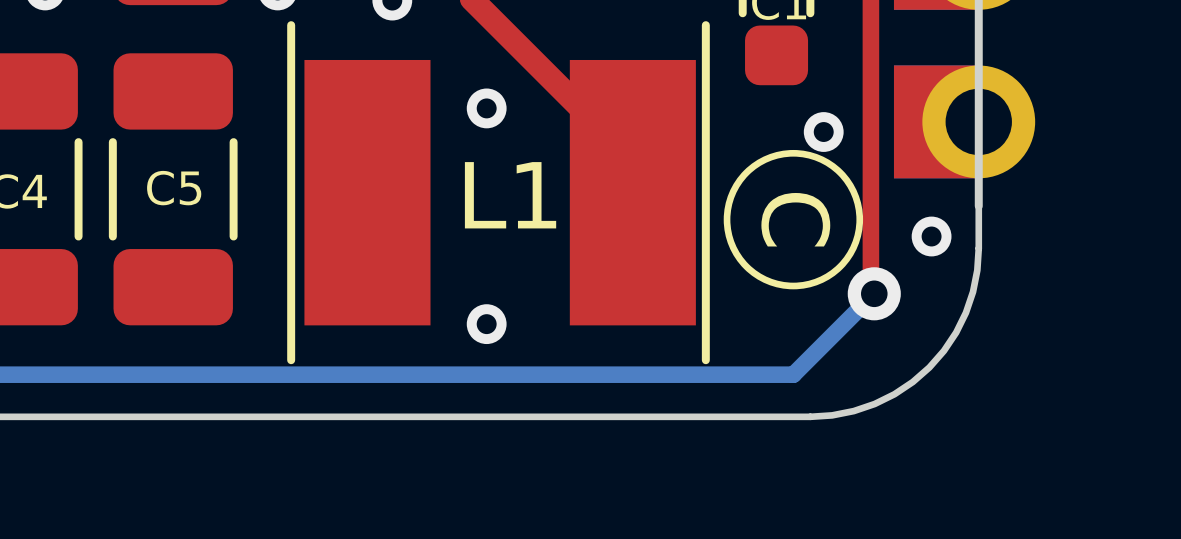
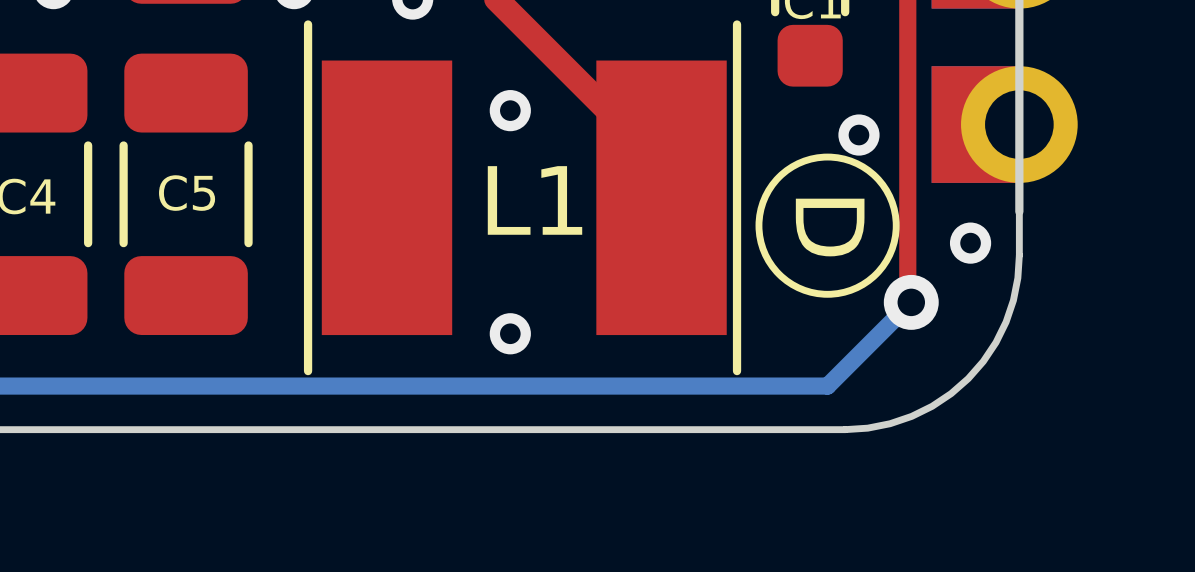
drawing shape: [723, 149, 864, 290] -> [755, 153, 900, 298]

